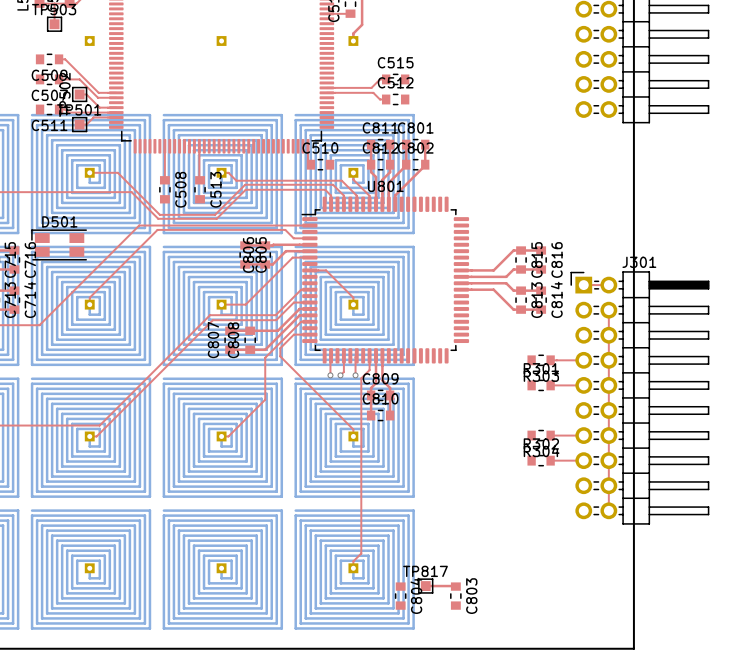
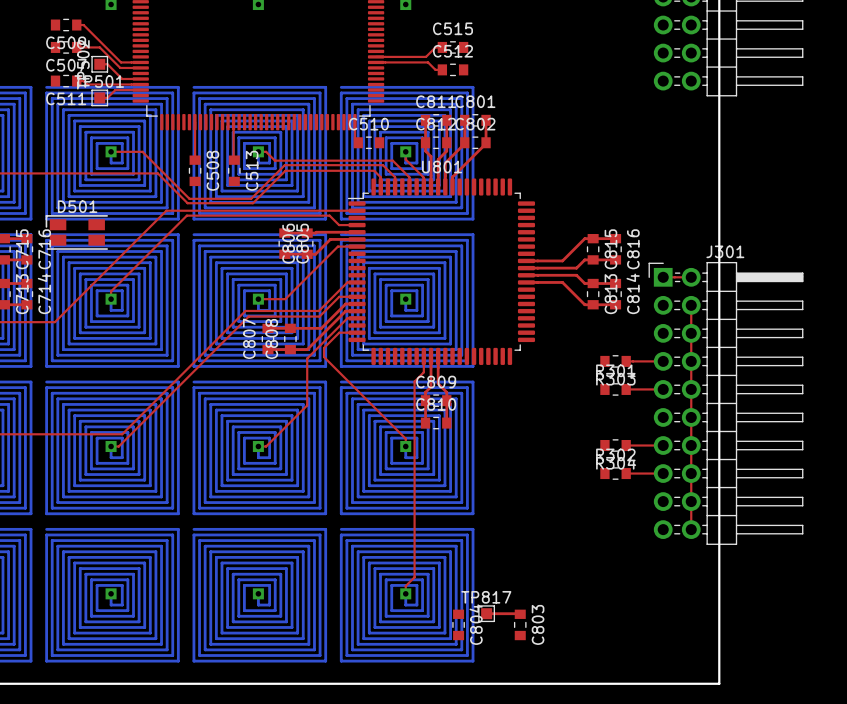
top track: (309, 270) (326, 270) (353, 297) (353, 304) -> none
top track: (331, 355) (330, 375) -> none
top track: (343, 355) (343, 371) (340, 375) -> none
top track: (356, 355) (355, 375) -> none
via: (330, 375) -> none
via: (340, 375) -> none
via: (355, 375) -> none

